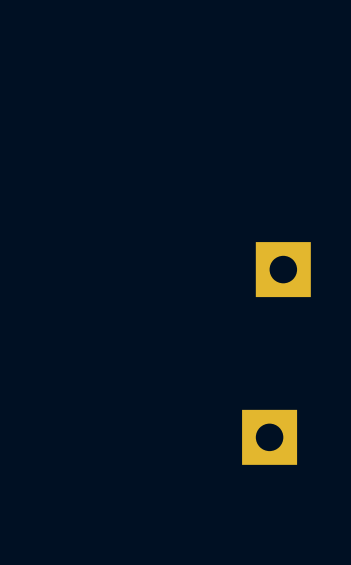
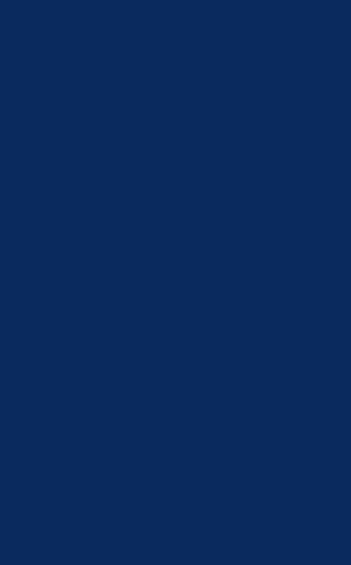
part: (283, 269) -> none
part: (269, 437) -> none

